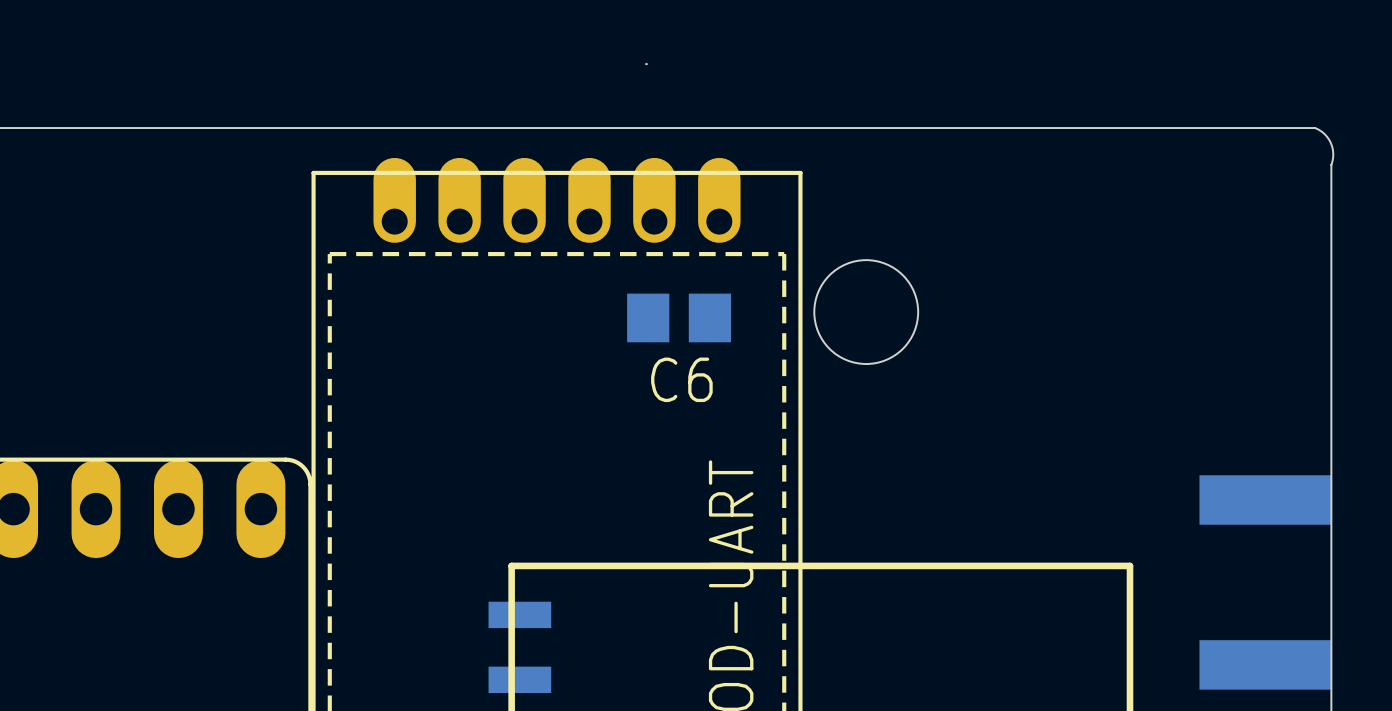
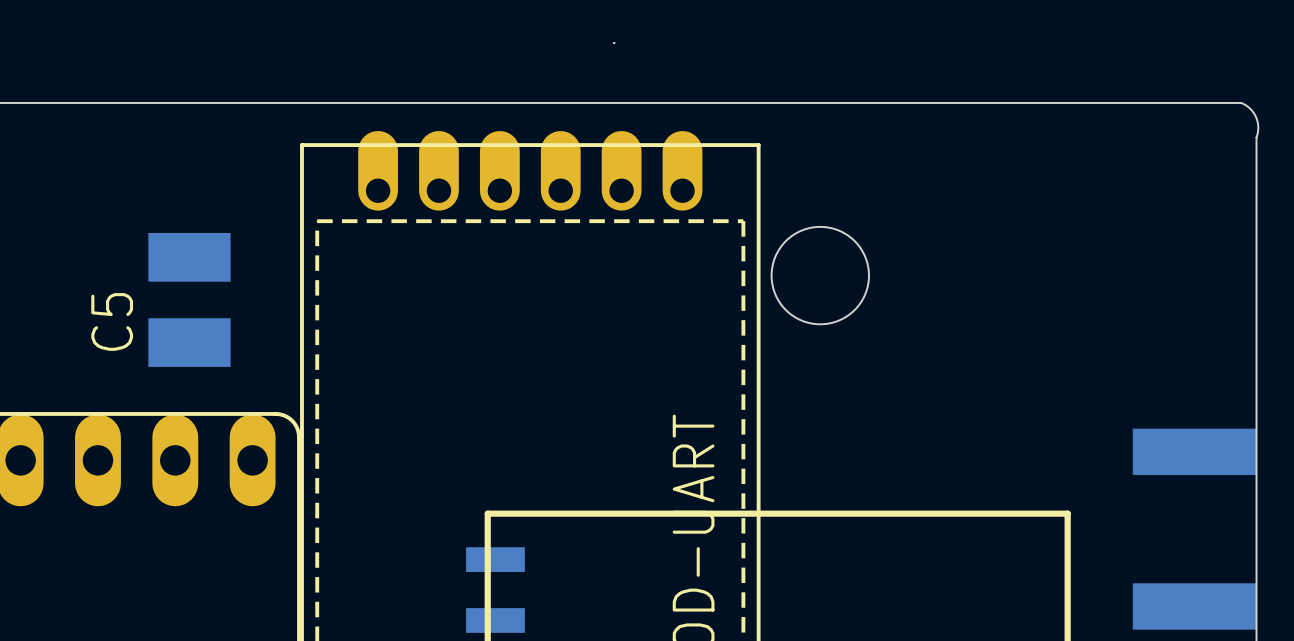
C6: (679, 317) -> none
C5: none -> (189, 299)

